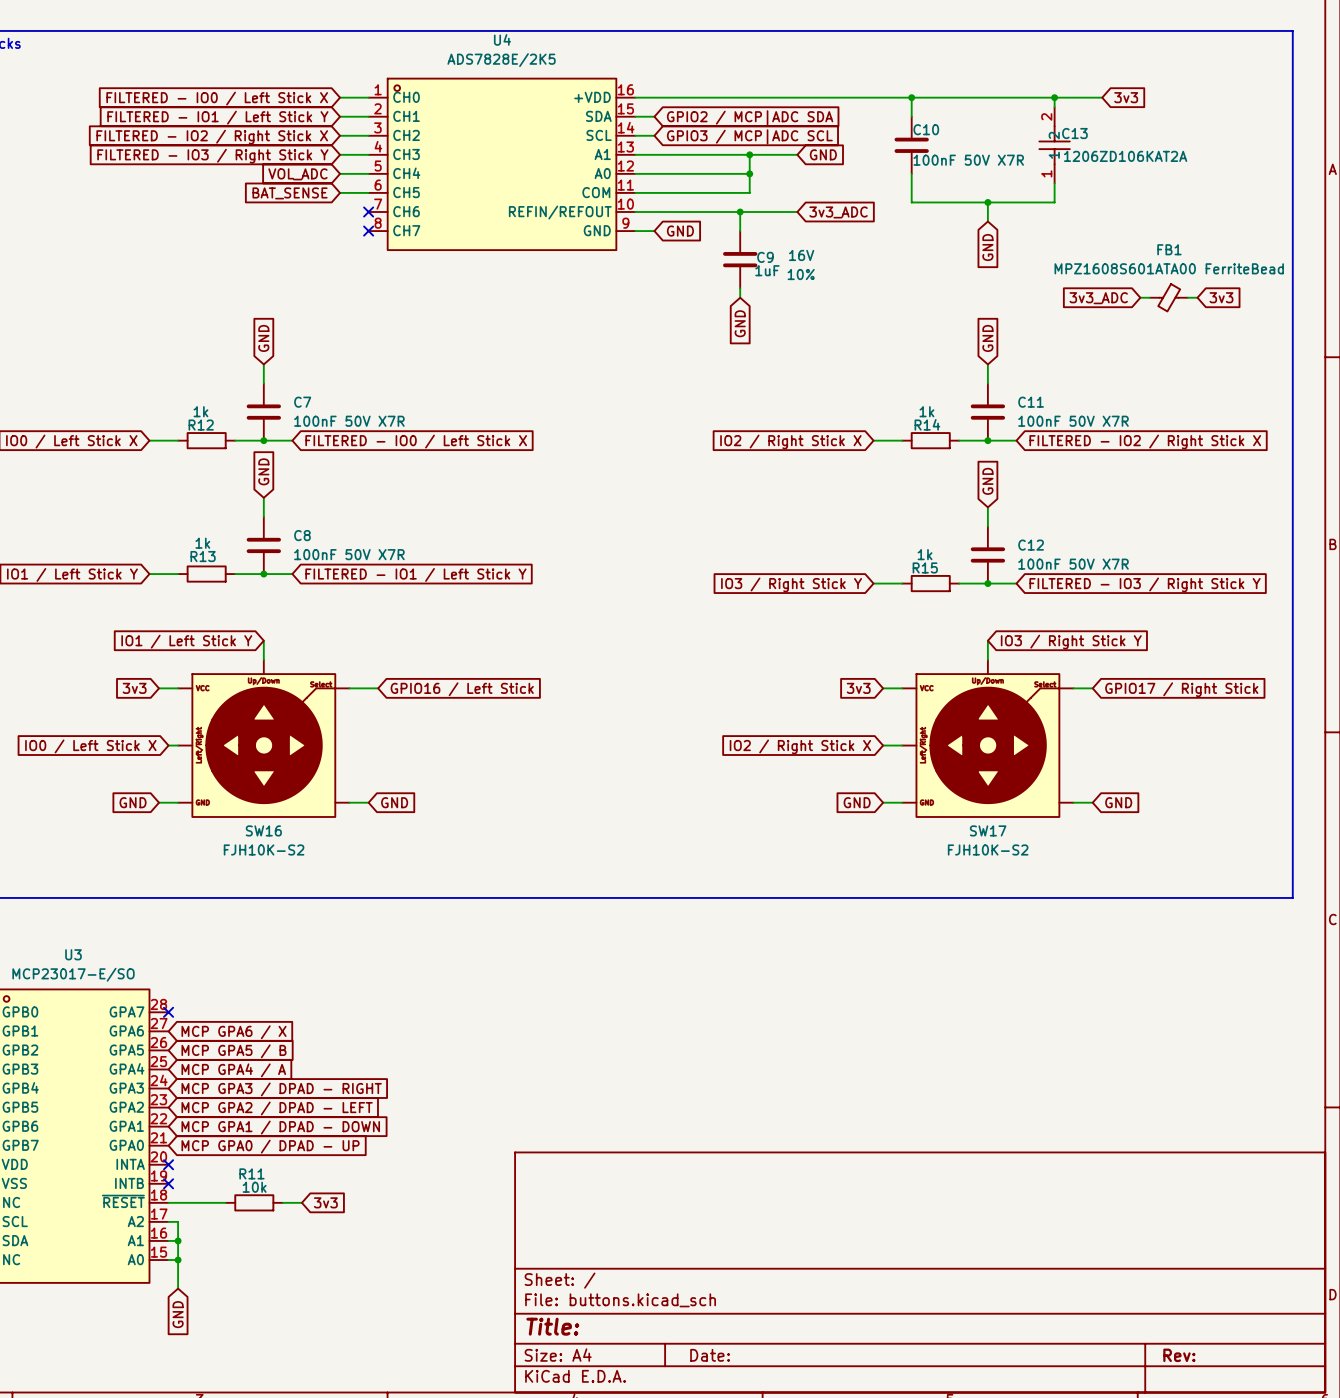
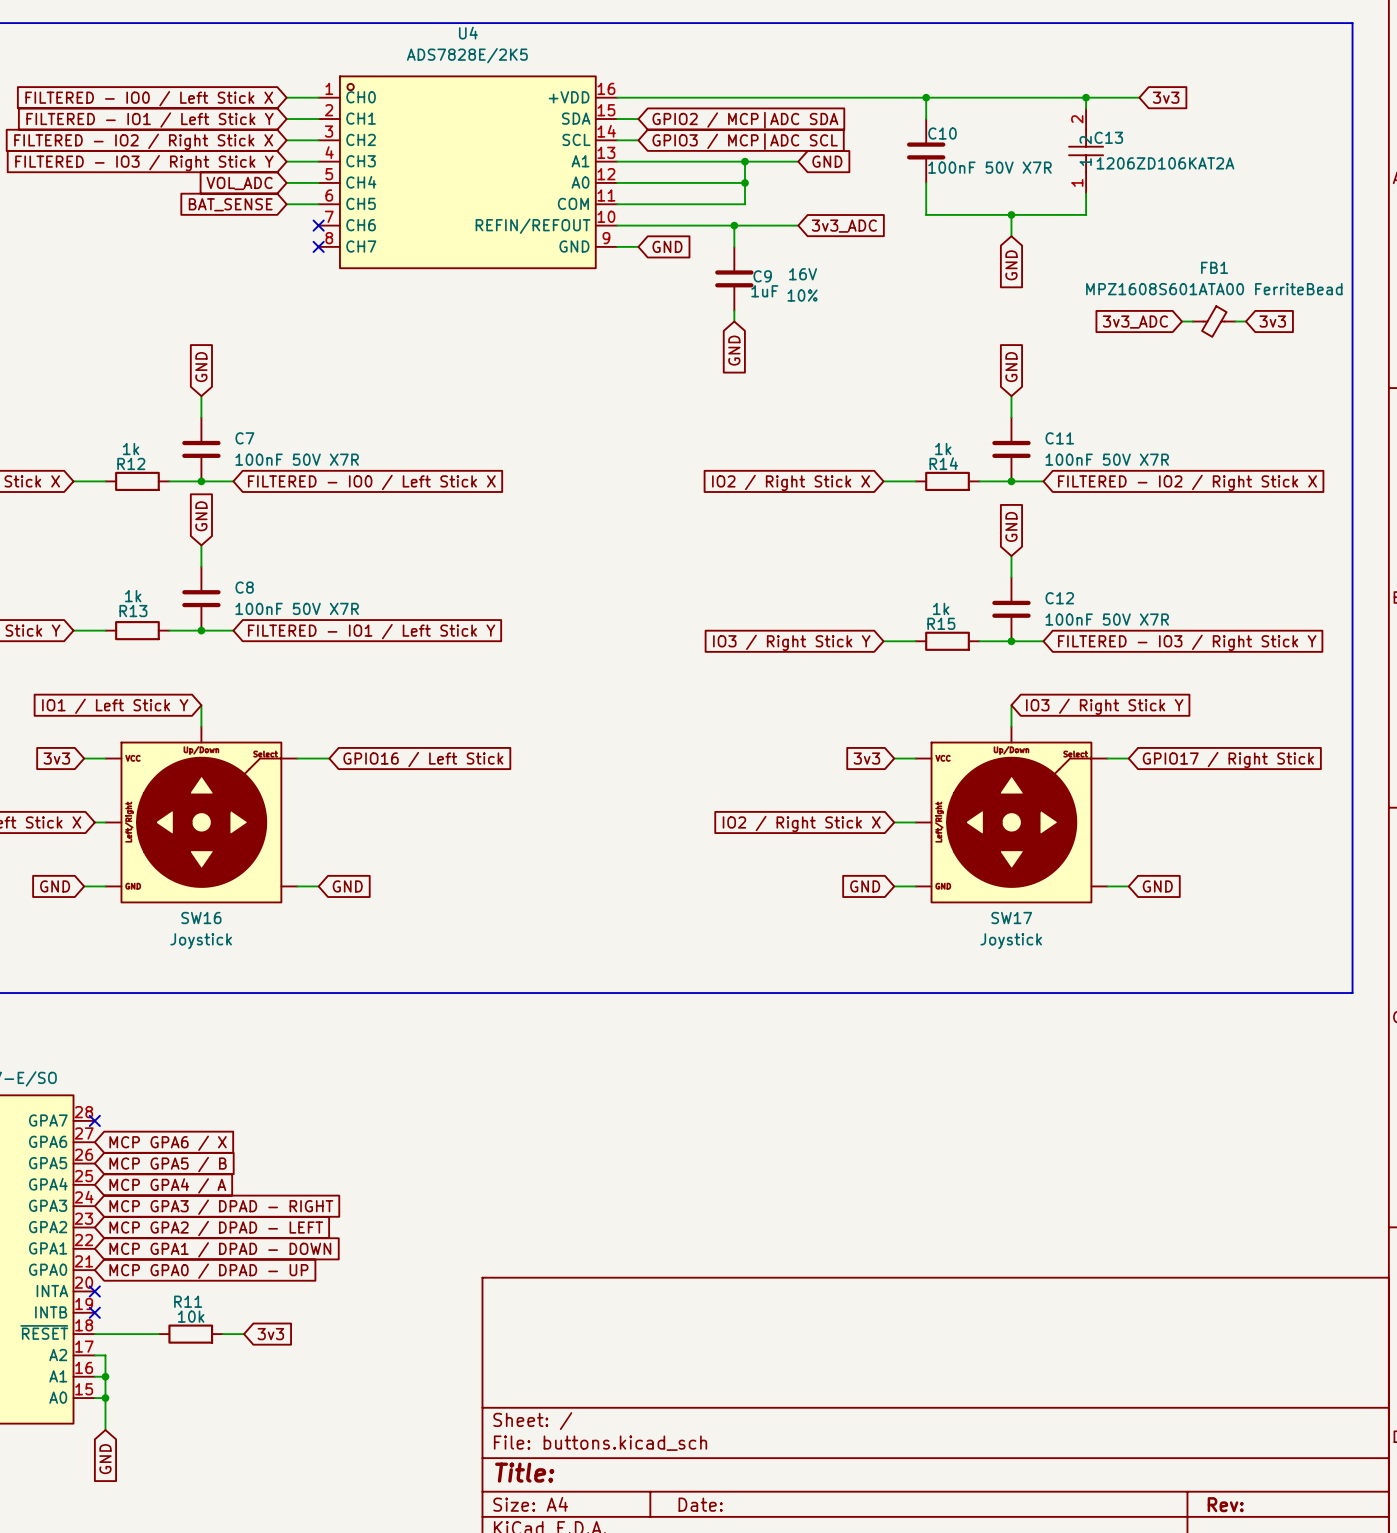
SW16 value: FJH10K-S2 (264, 849) -> Joystick (201, 941)
SW17 value: FJH10K-S2 (988, 849) -> Joystick (1011, 941)

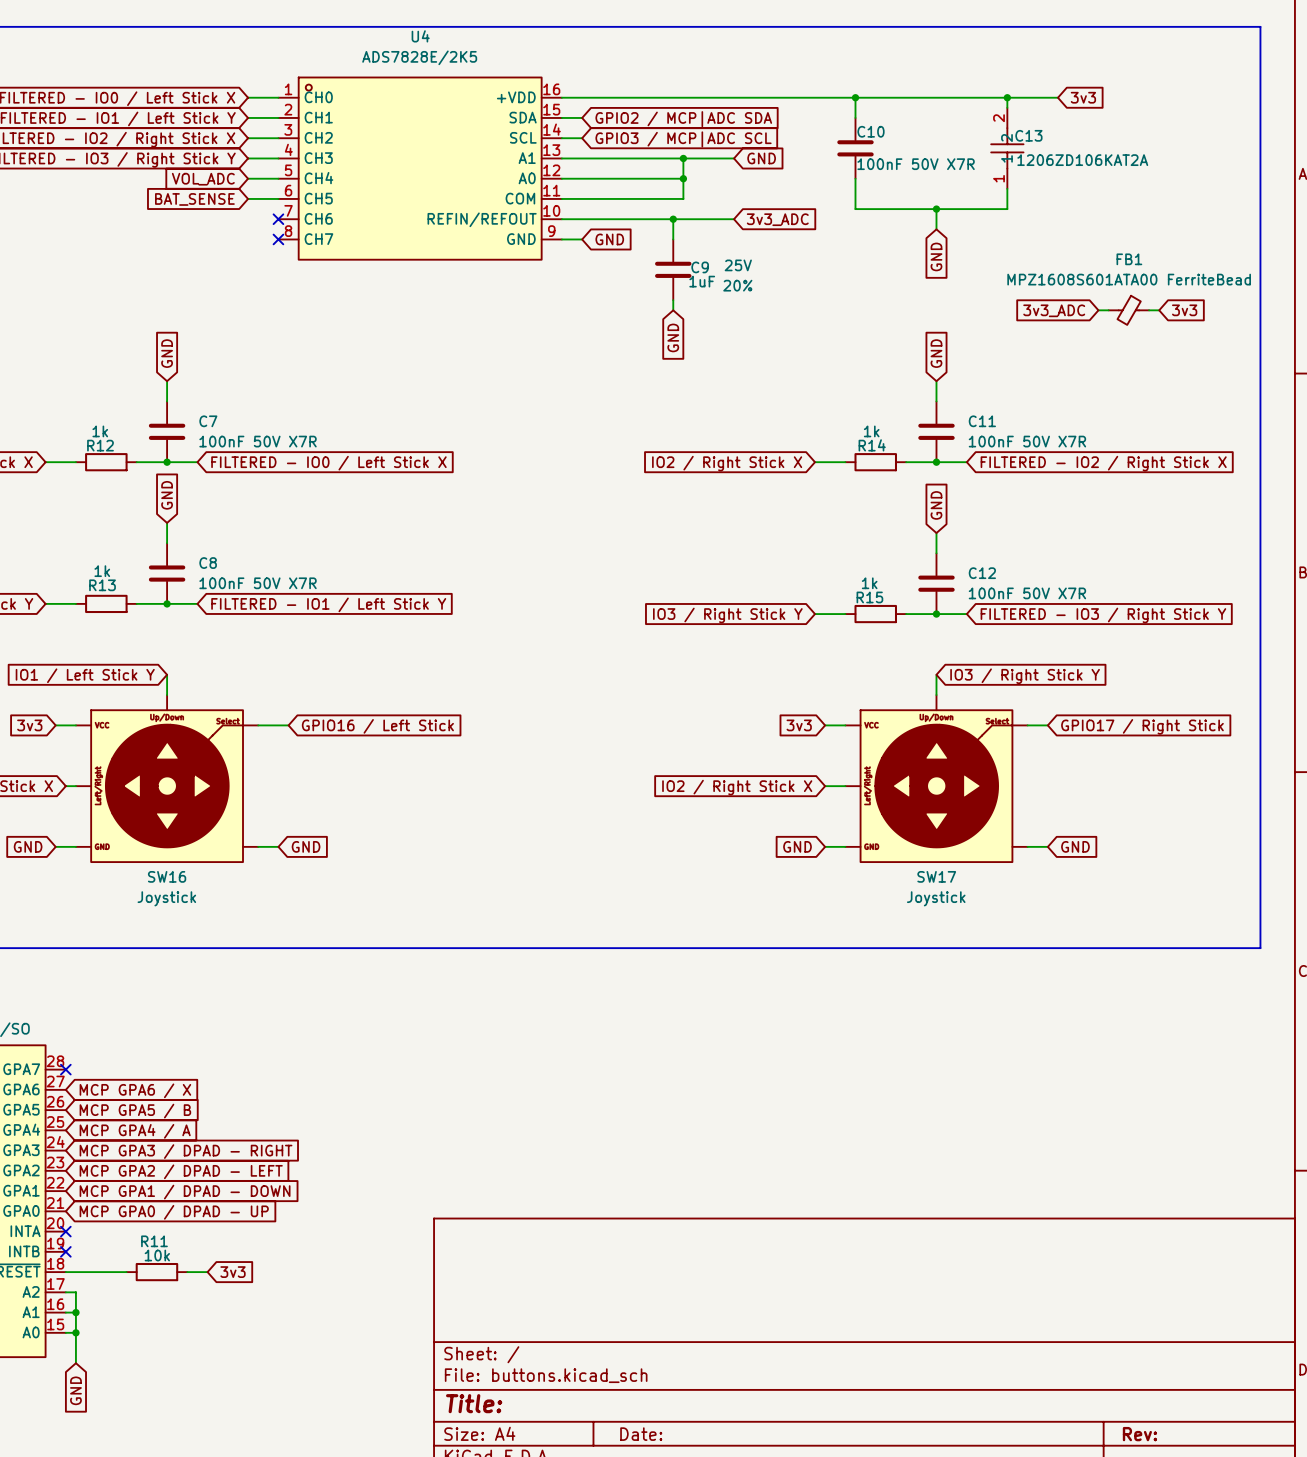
C9 text: 16V (803, 274) -> 25V (738, 265)
C9 text: 10% (802, 295) -> 20% (737, 285)

